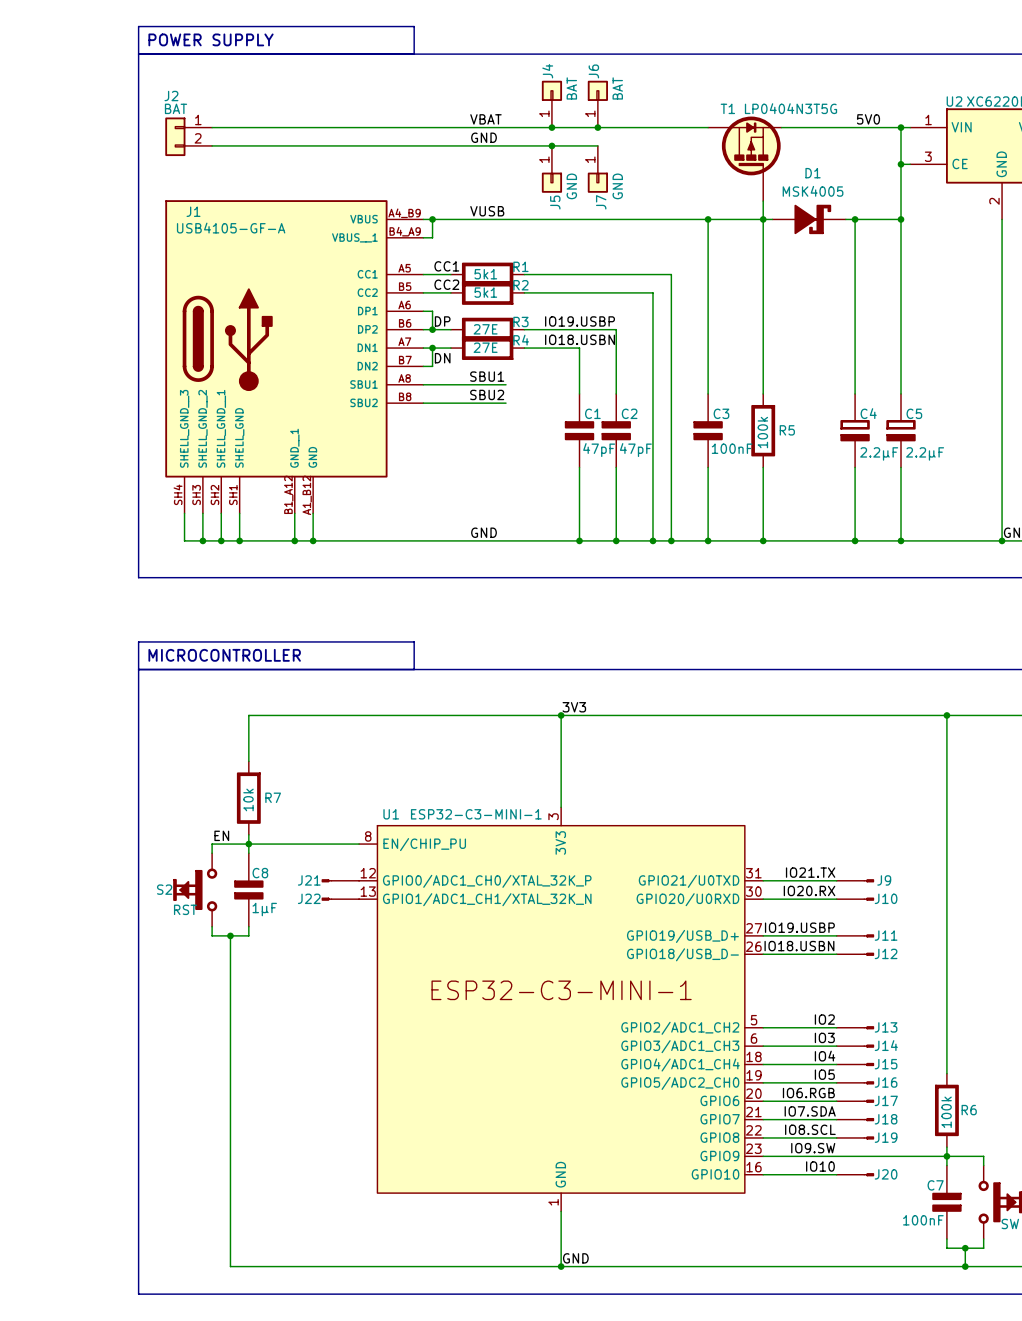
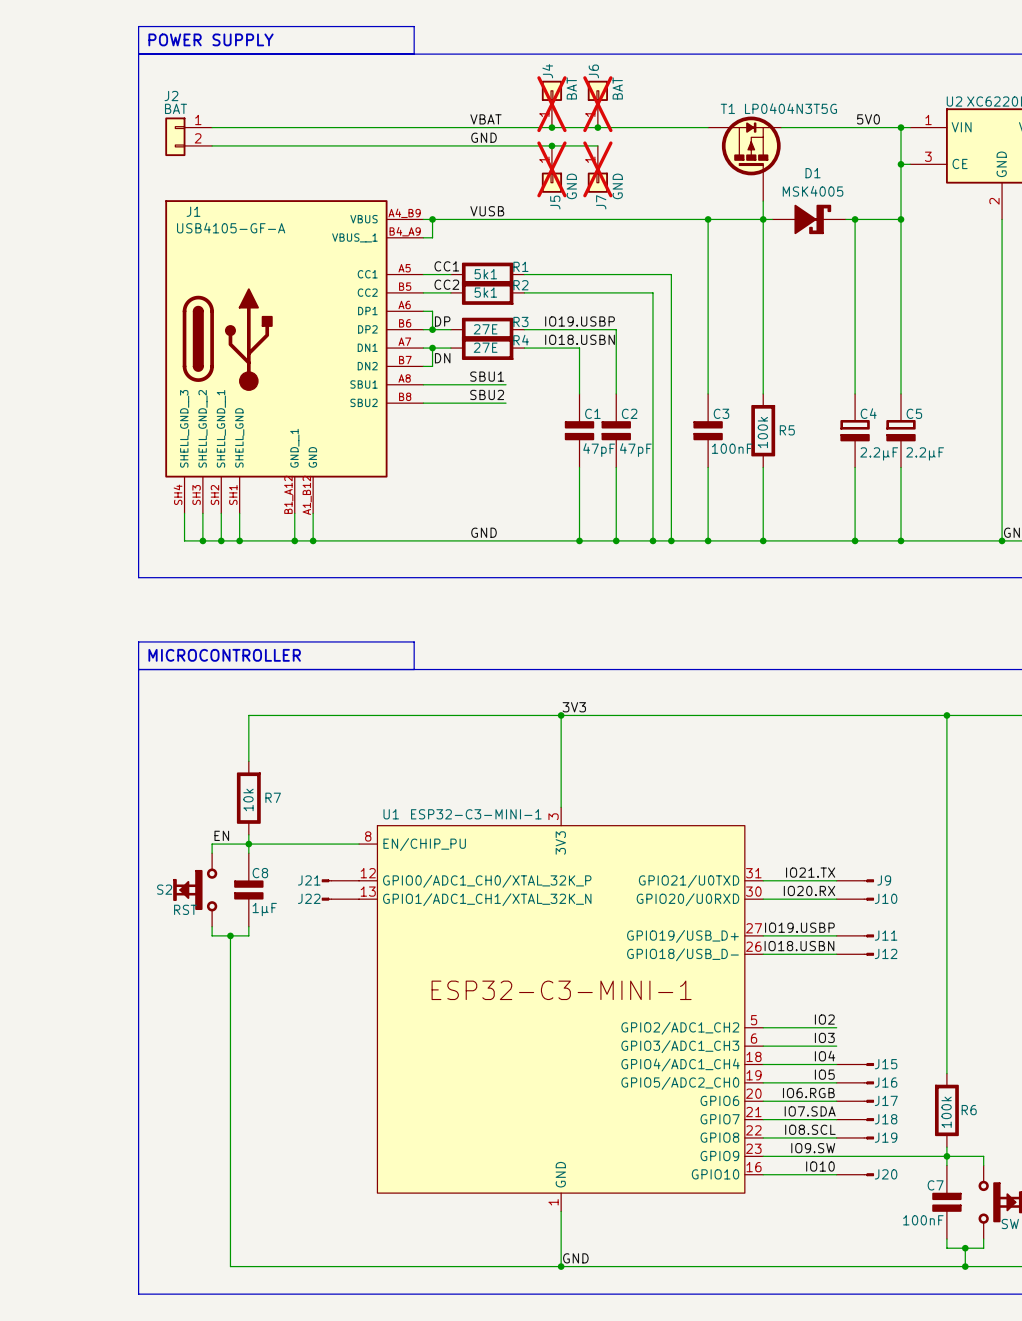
J4 do-not-place cross: none -> (551, 104)
J6 do-not-place cross: none -> (597, 104)
J5 do-not-place cross: none -> (551, 169)
J7 do-not-place cross: none -> (597, 169)
J13: (855, 1027) -> none
J14: (855, 1046) -> none

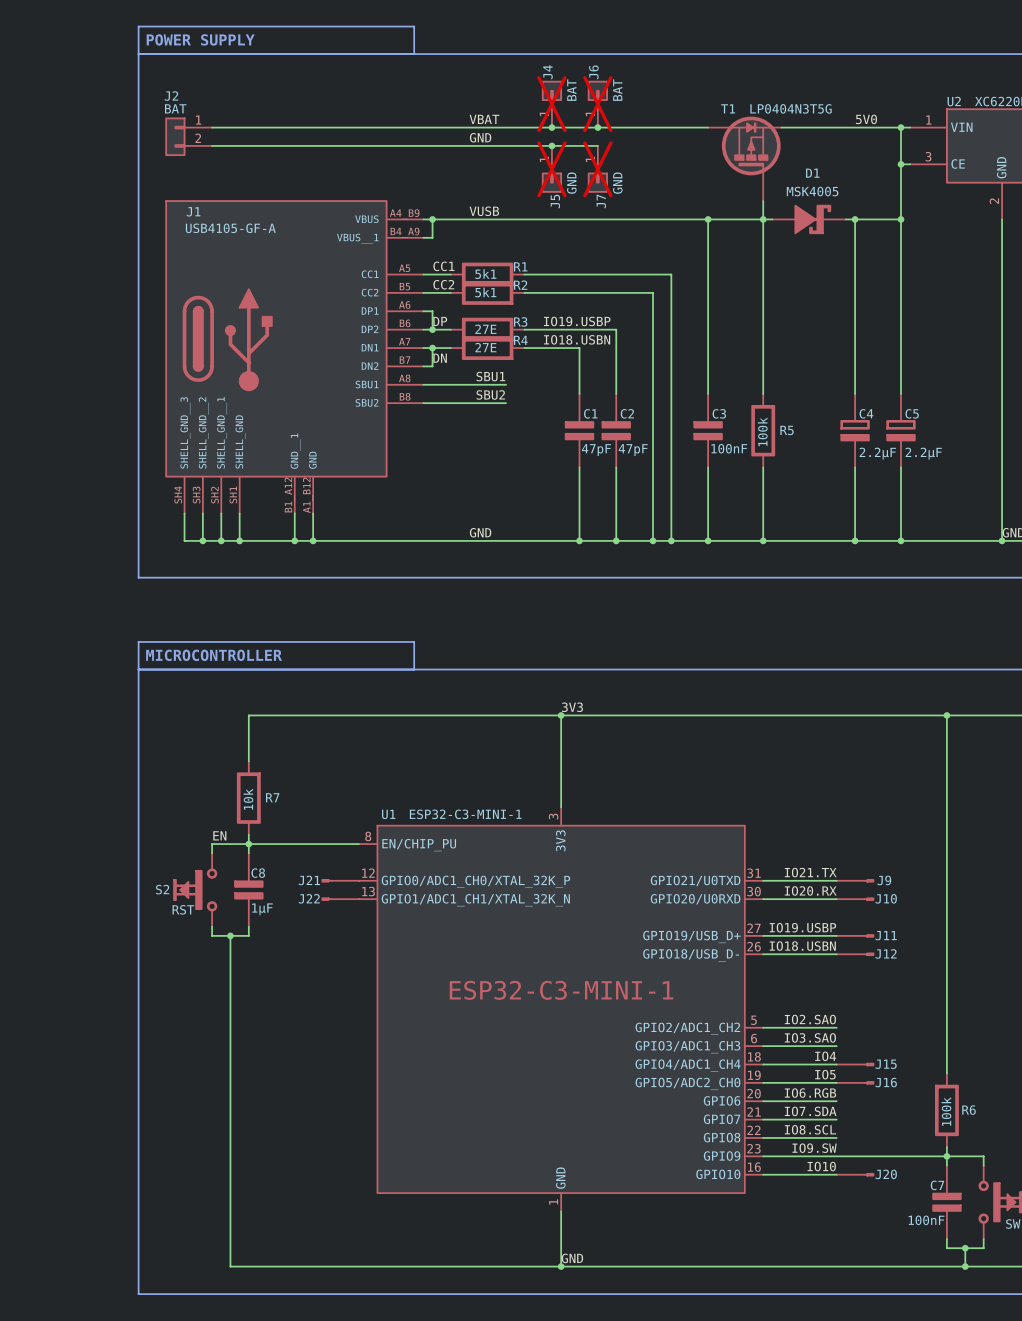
label: IO2 (824, 1019) -> IO2.SAO (810, 1019)
label: IO3 (824, 1037) -> IO3.SAO (810, 1037)
J17: (855, 1101) -> none
J18: (855, 1119) -> none
J19: (855, 1137) -> none

